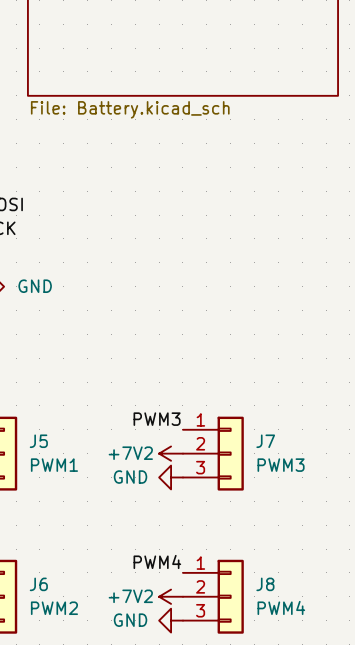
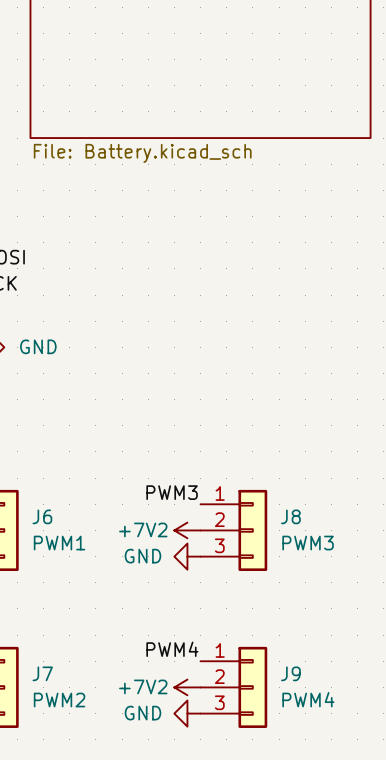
J5 name: J5 (38, 441) -> J6 (42, 516)
J7 name: J7 (265, 441) -> J8 (290, 516)
J6 name: J6 (38, 584) -> J7 (42, 673)
J8 name: J8 (265, 584) -> J9 (290, 673)

